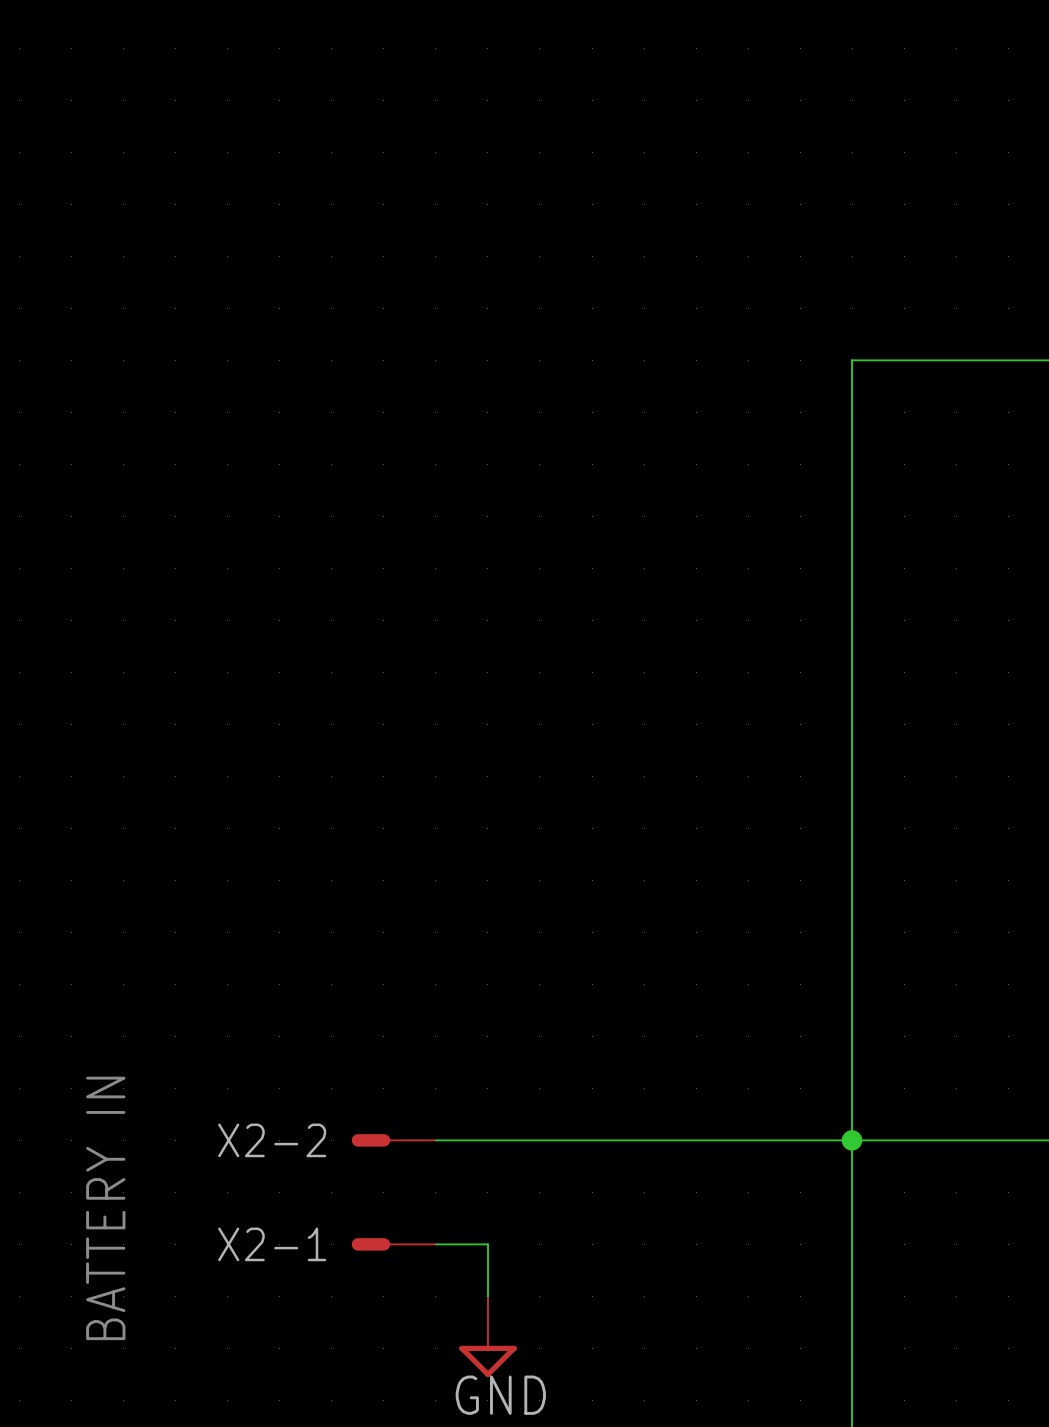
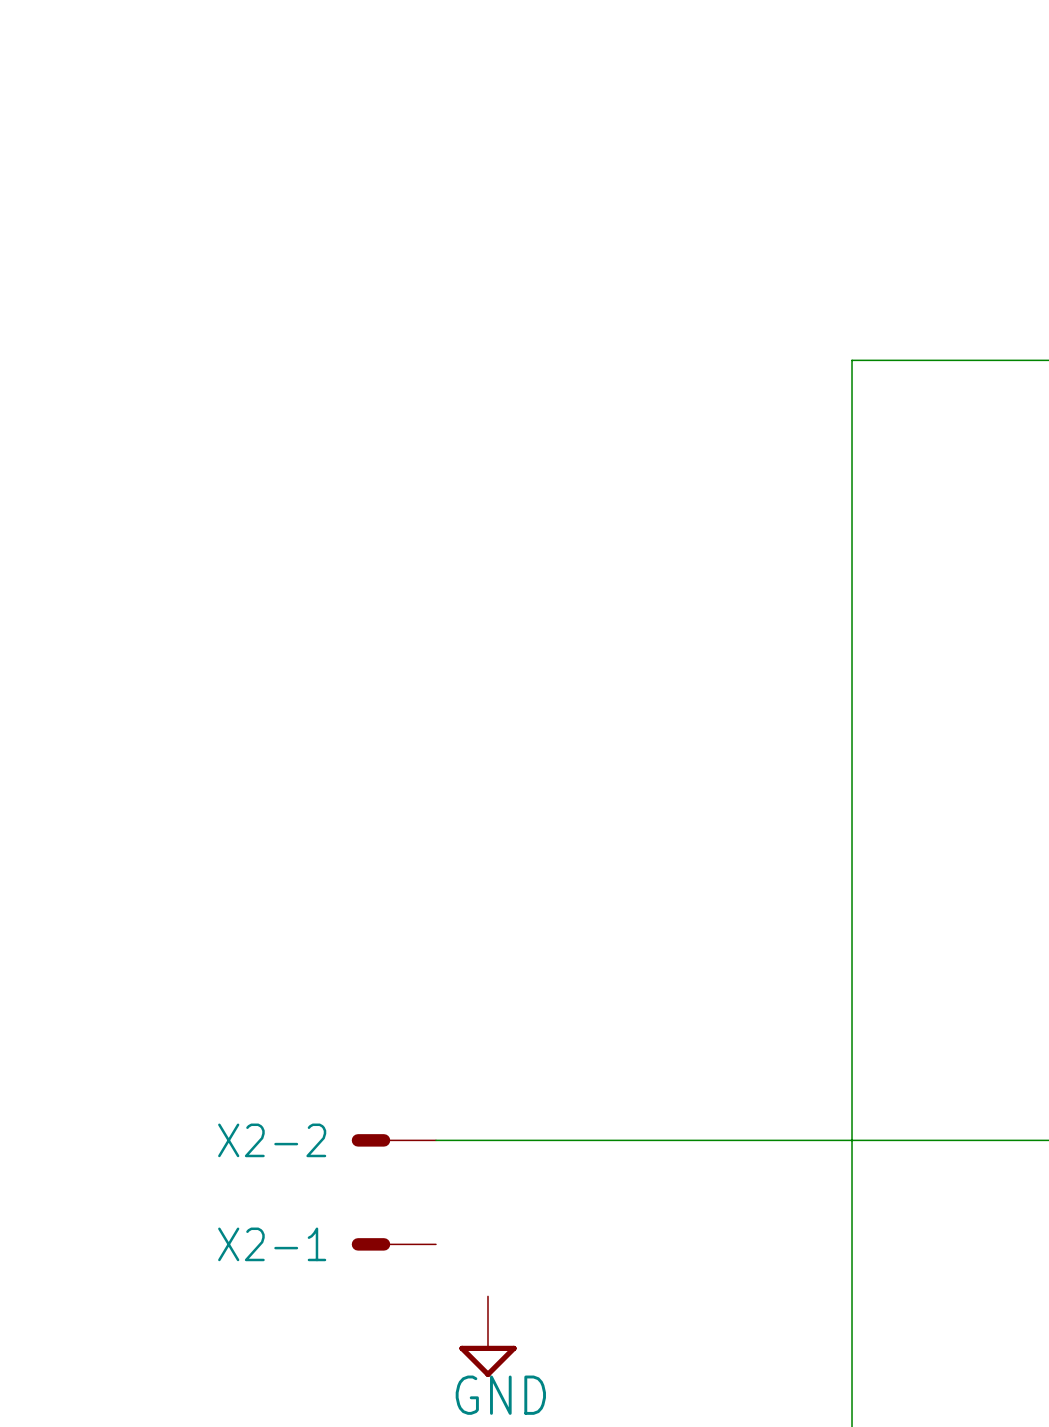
junction: (852, 1140) -> none
text: BATTERY IN (105, 1208) -> none
wire: (435, 1244) (487, 1244) (487, 1296) -> none

